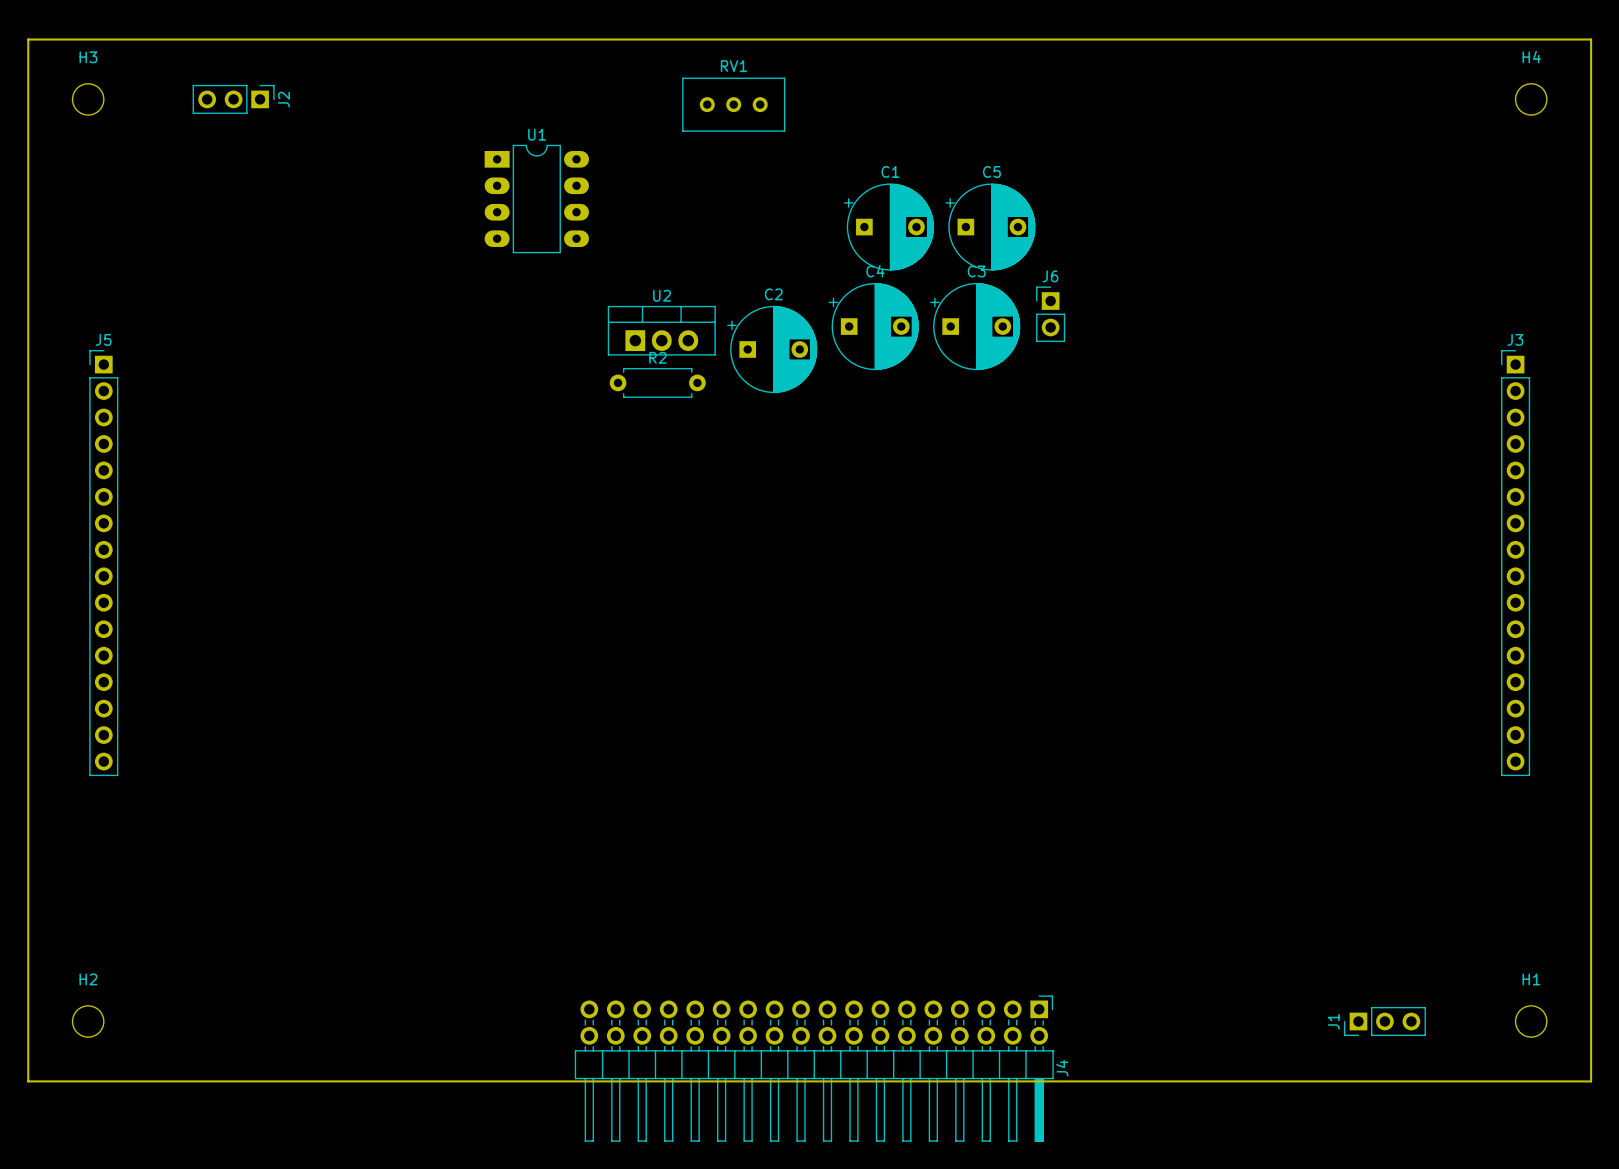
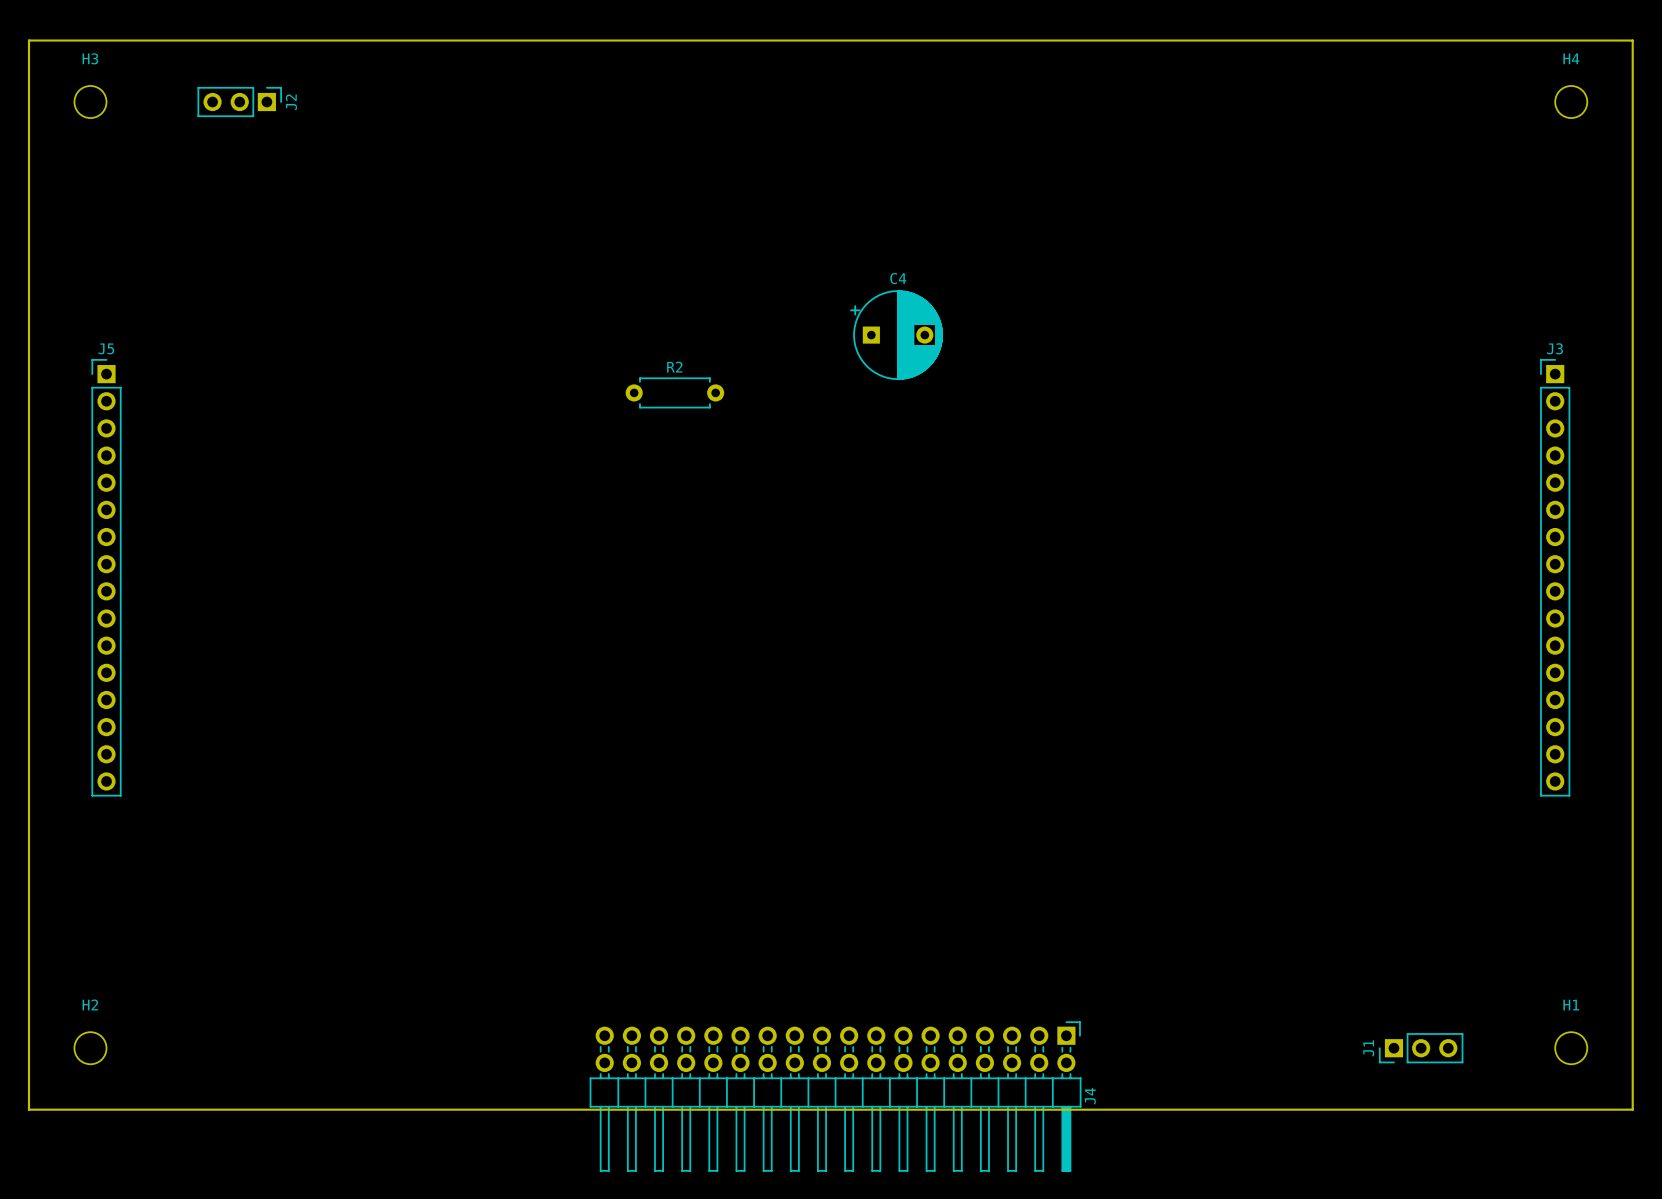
RV1: (733, 104) -> none
U1: (536, 199) -> none
C1: (888, 227) -> none
C5: (990, 227) -> none
J6: (1050, 314) -> none
C3: (975, 326) -> none
U2: (661, 330) -> none
C2: (772, 349) -> none

